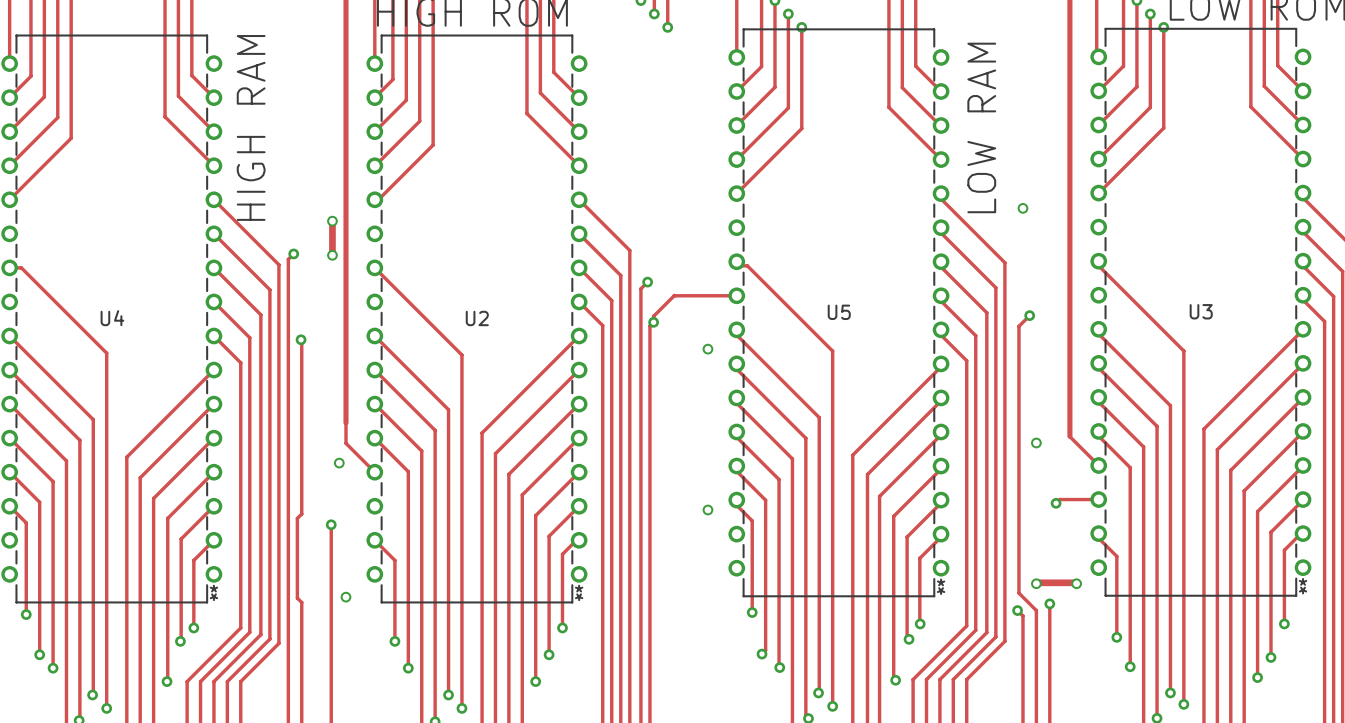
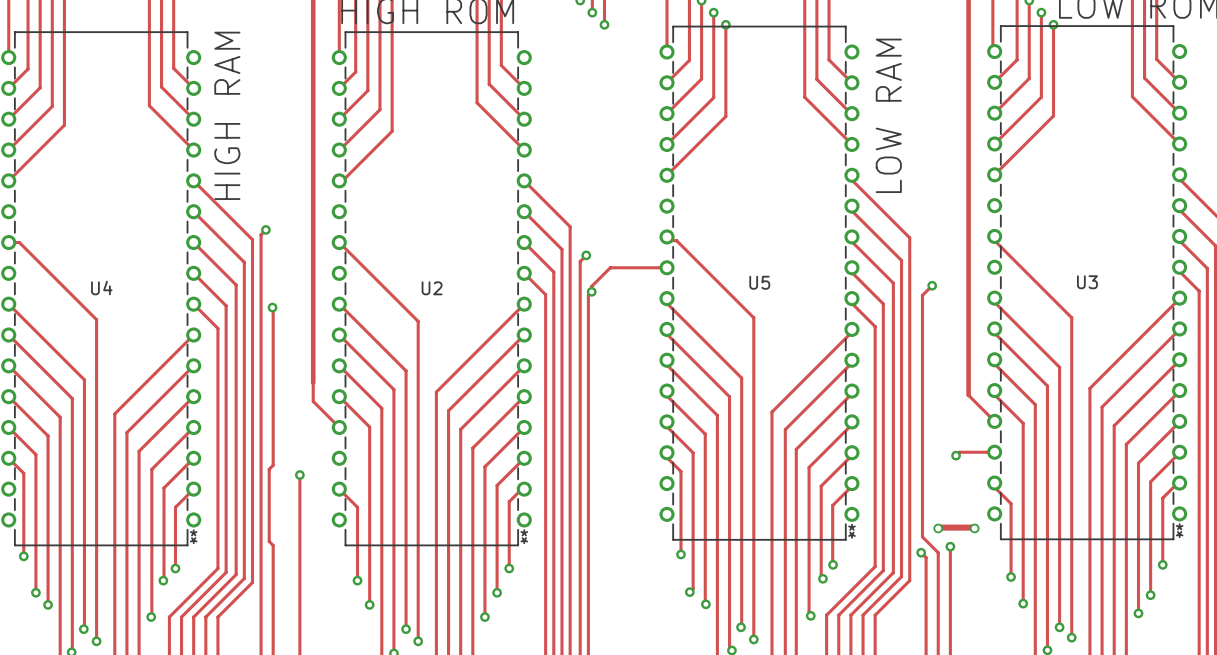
via: (1022, 208) -> none
track: (332, 221) (332, 255) -> none
via: (332, 221) -> none
via: (332, 255) -> none
via: (707, 349) -> none
via: (1036, 442) -> none
via: (339, 463) -> none
via: (707, 510) -> none
via: (345, 597) -> none

